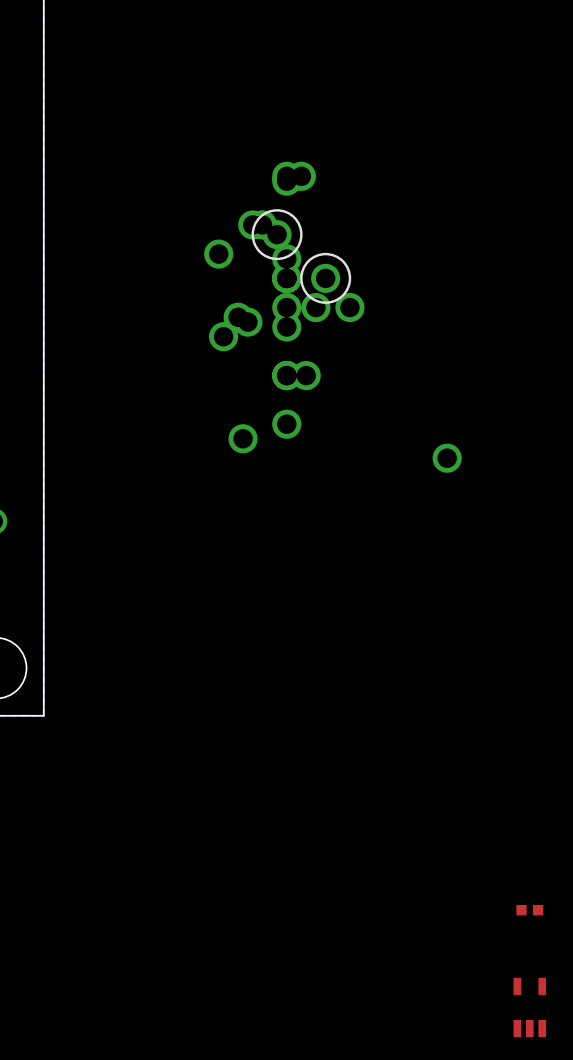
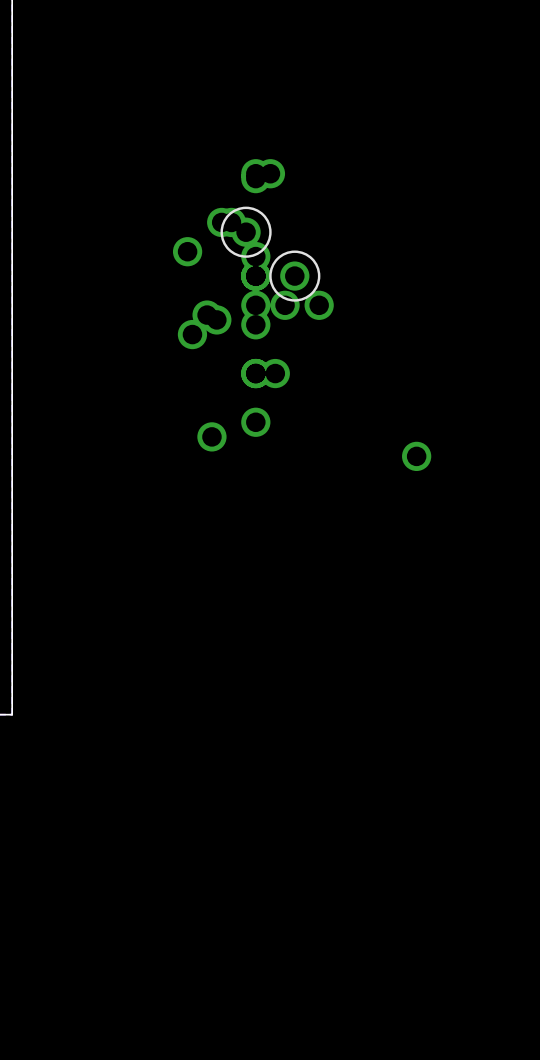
part: (529, 910) -> none
part: (529, 1007) -> none

